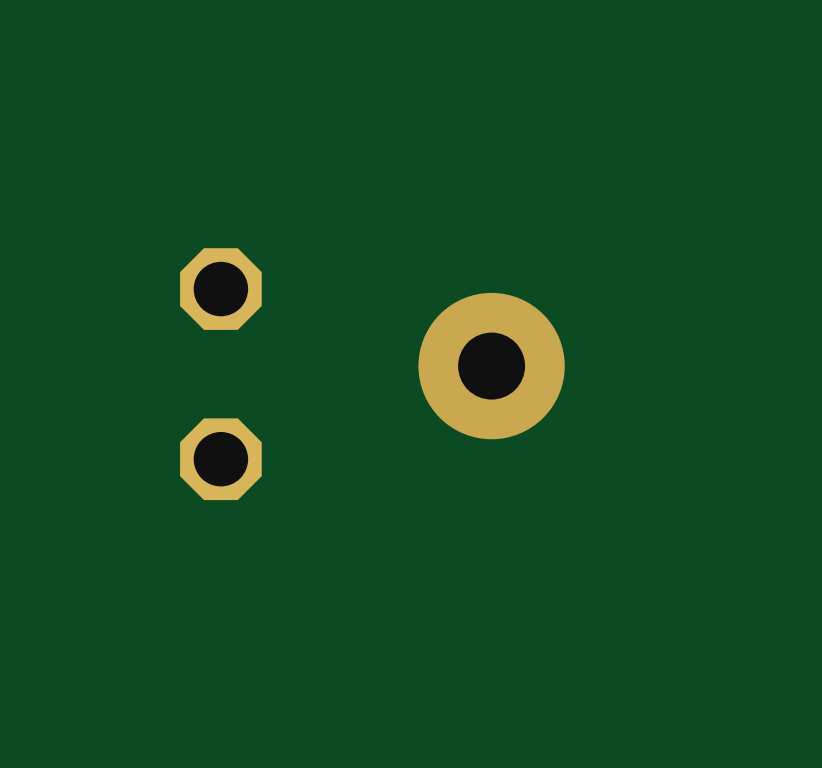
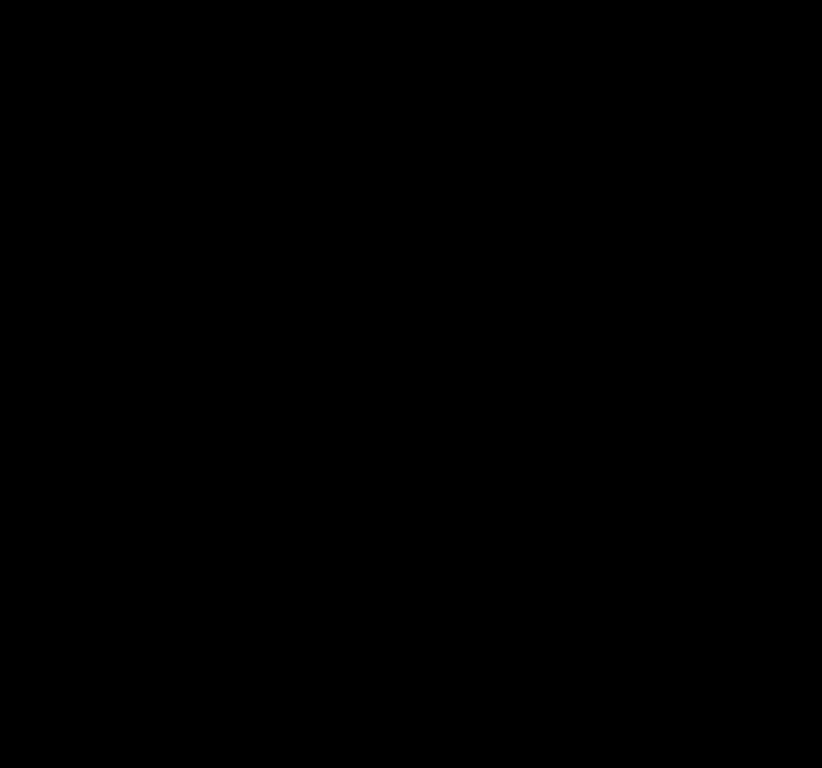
via: (491, 366) -> none
part: (220, 374) -> none

